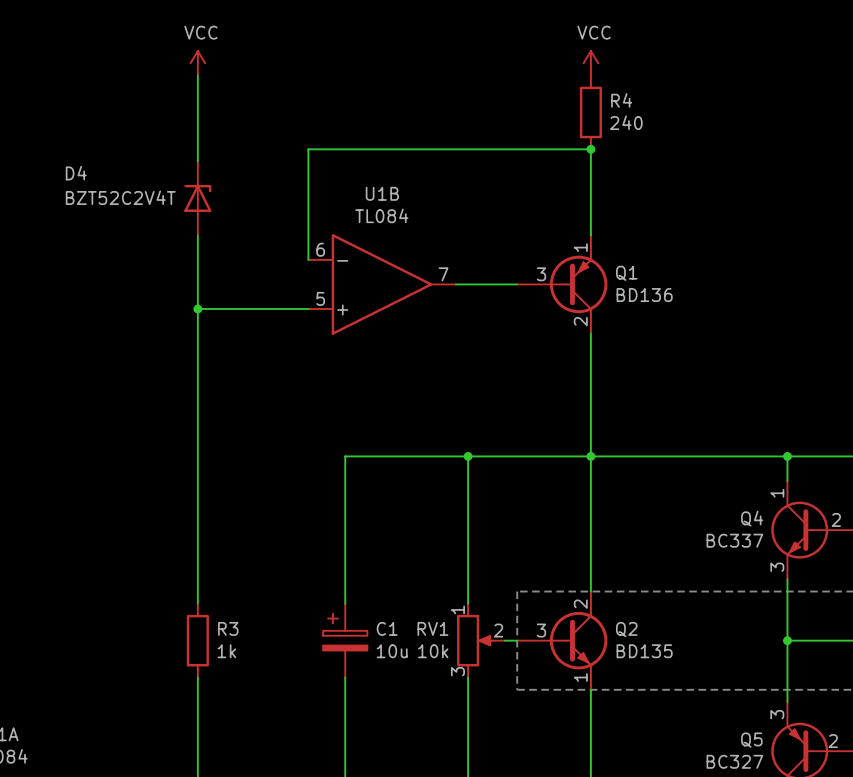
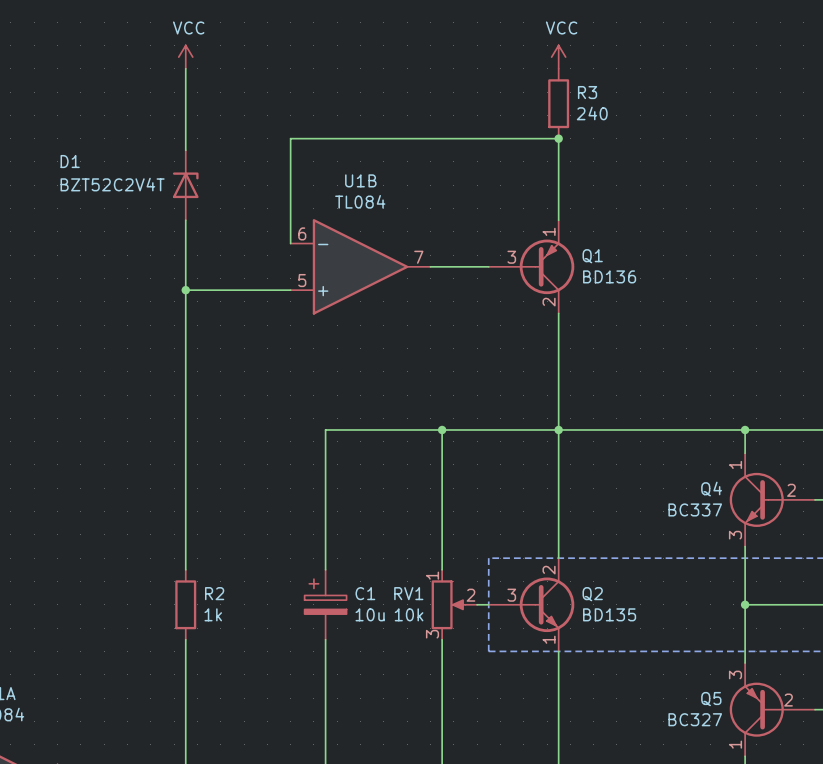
R4 name: R4 (621, 100) -> R3 (587, 92)
D4 name: D4 (76, 173) -> D1 (70, 161)
R3 name: R3 (228, 628) -> R2 (214, 593)

